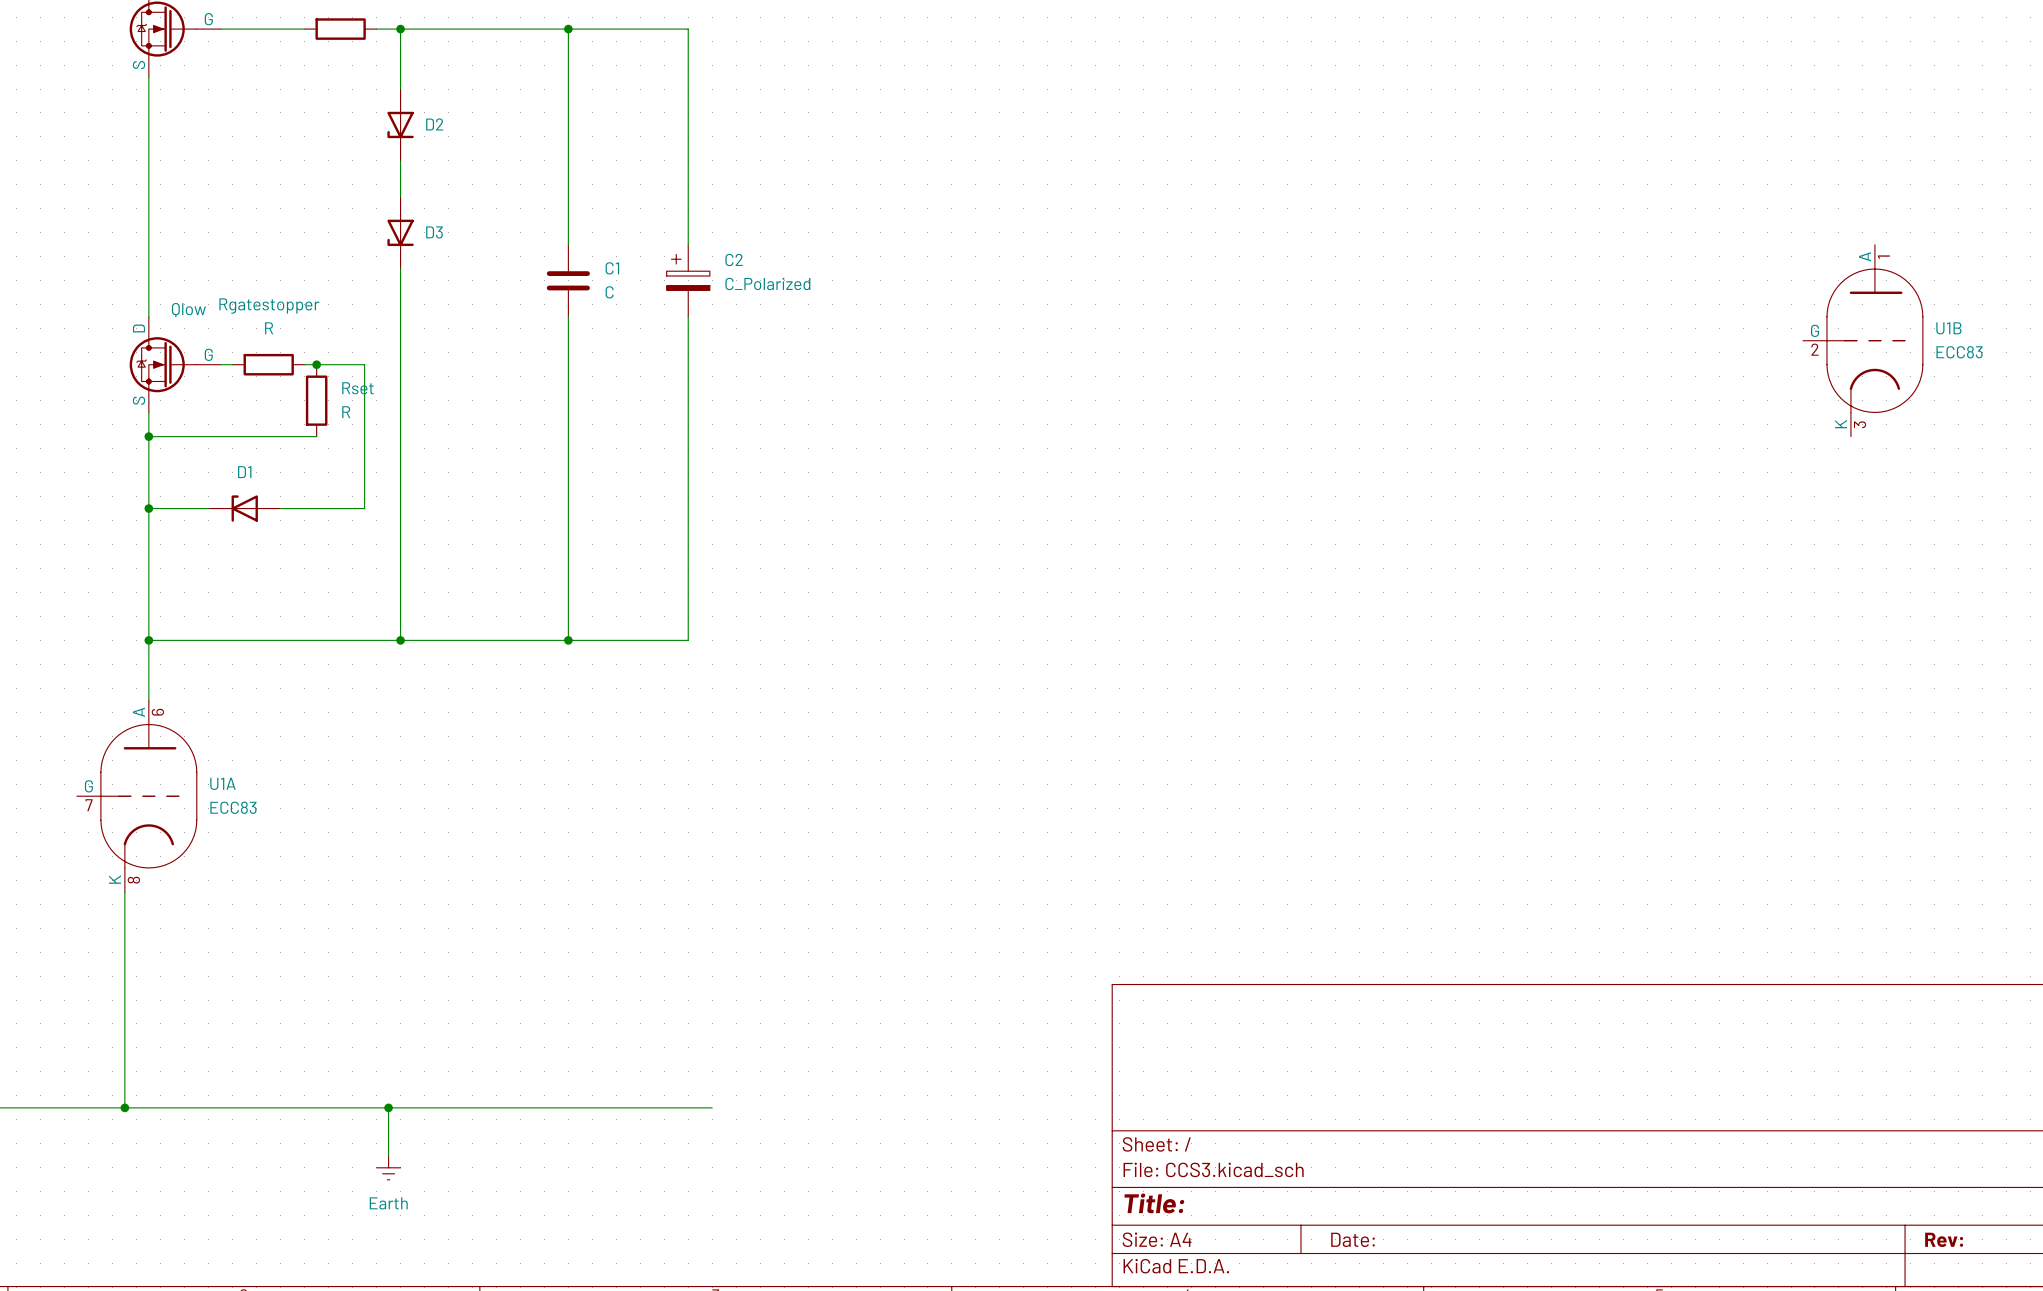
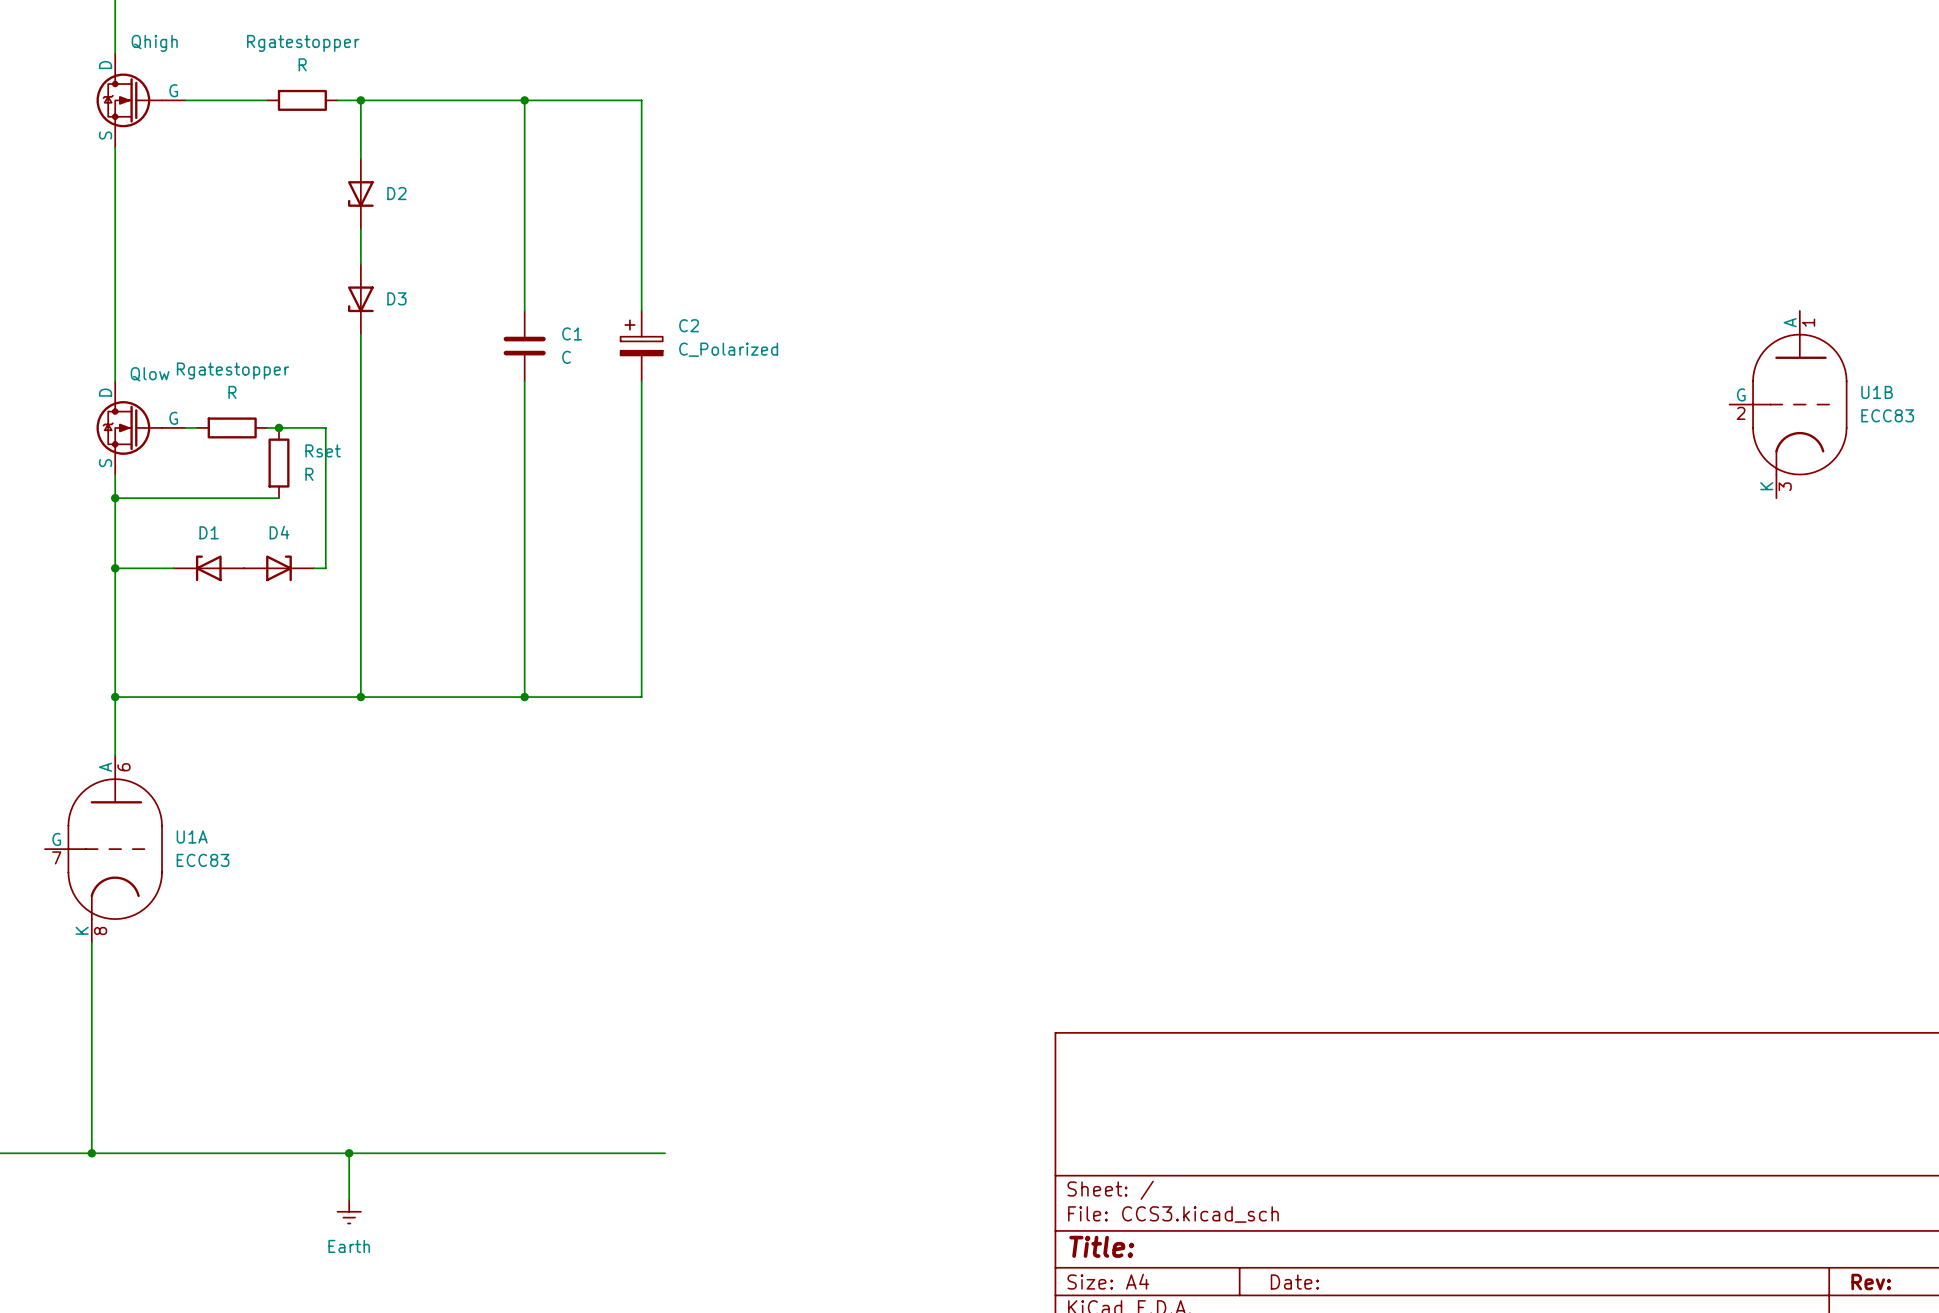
D4: none -> (278, 568)

